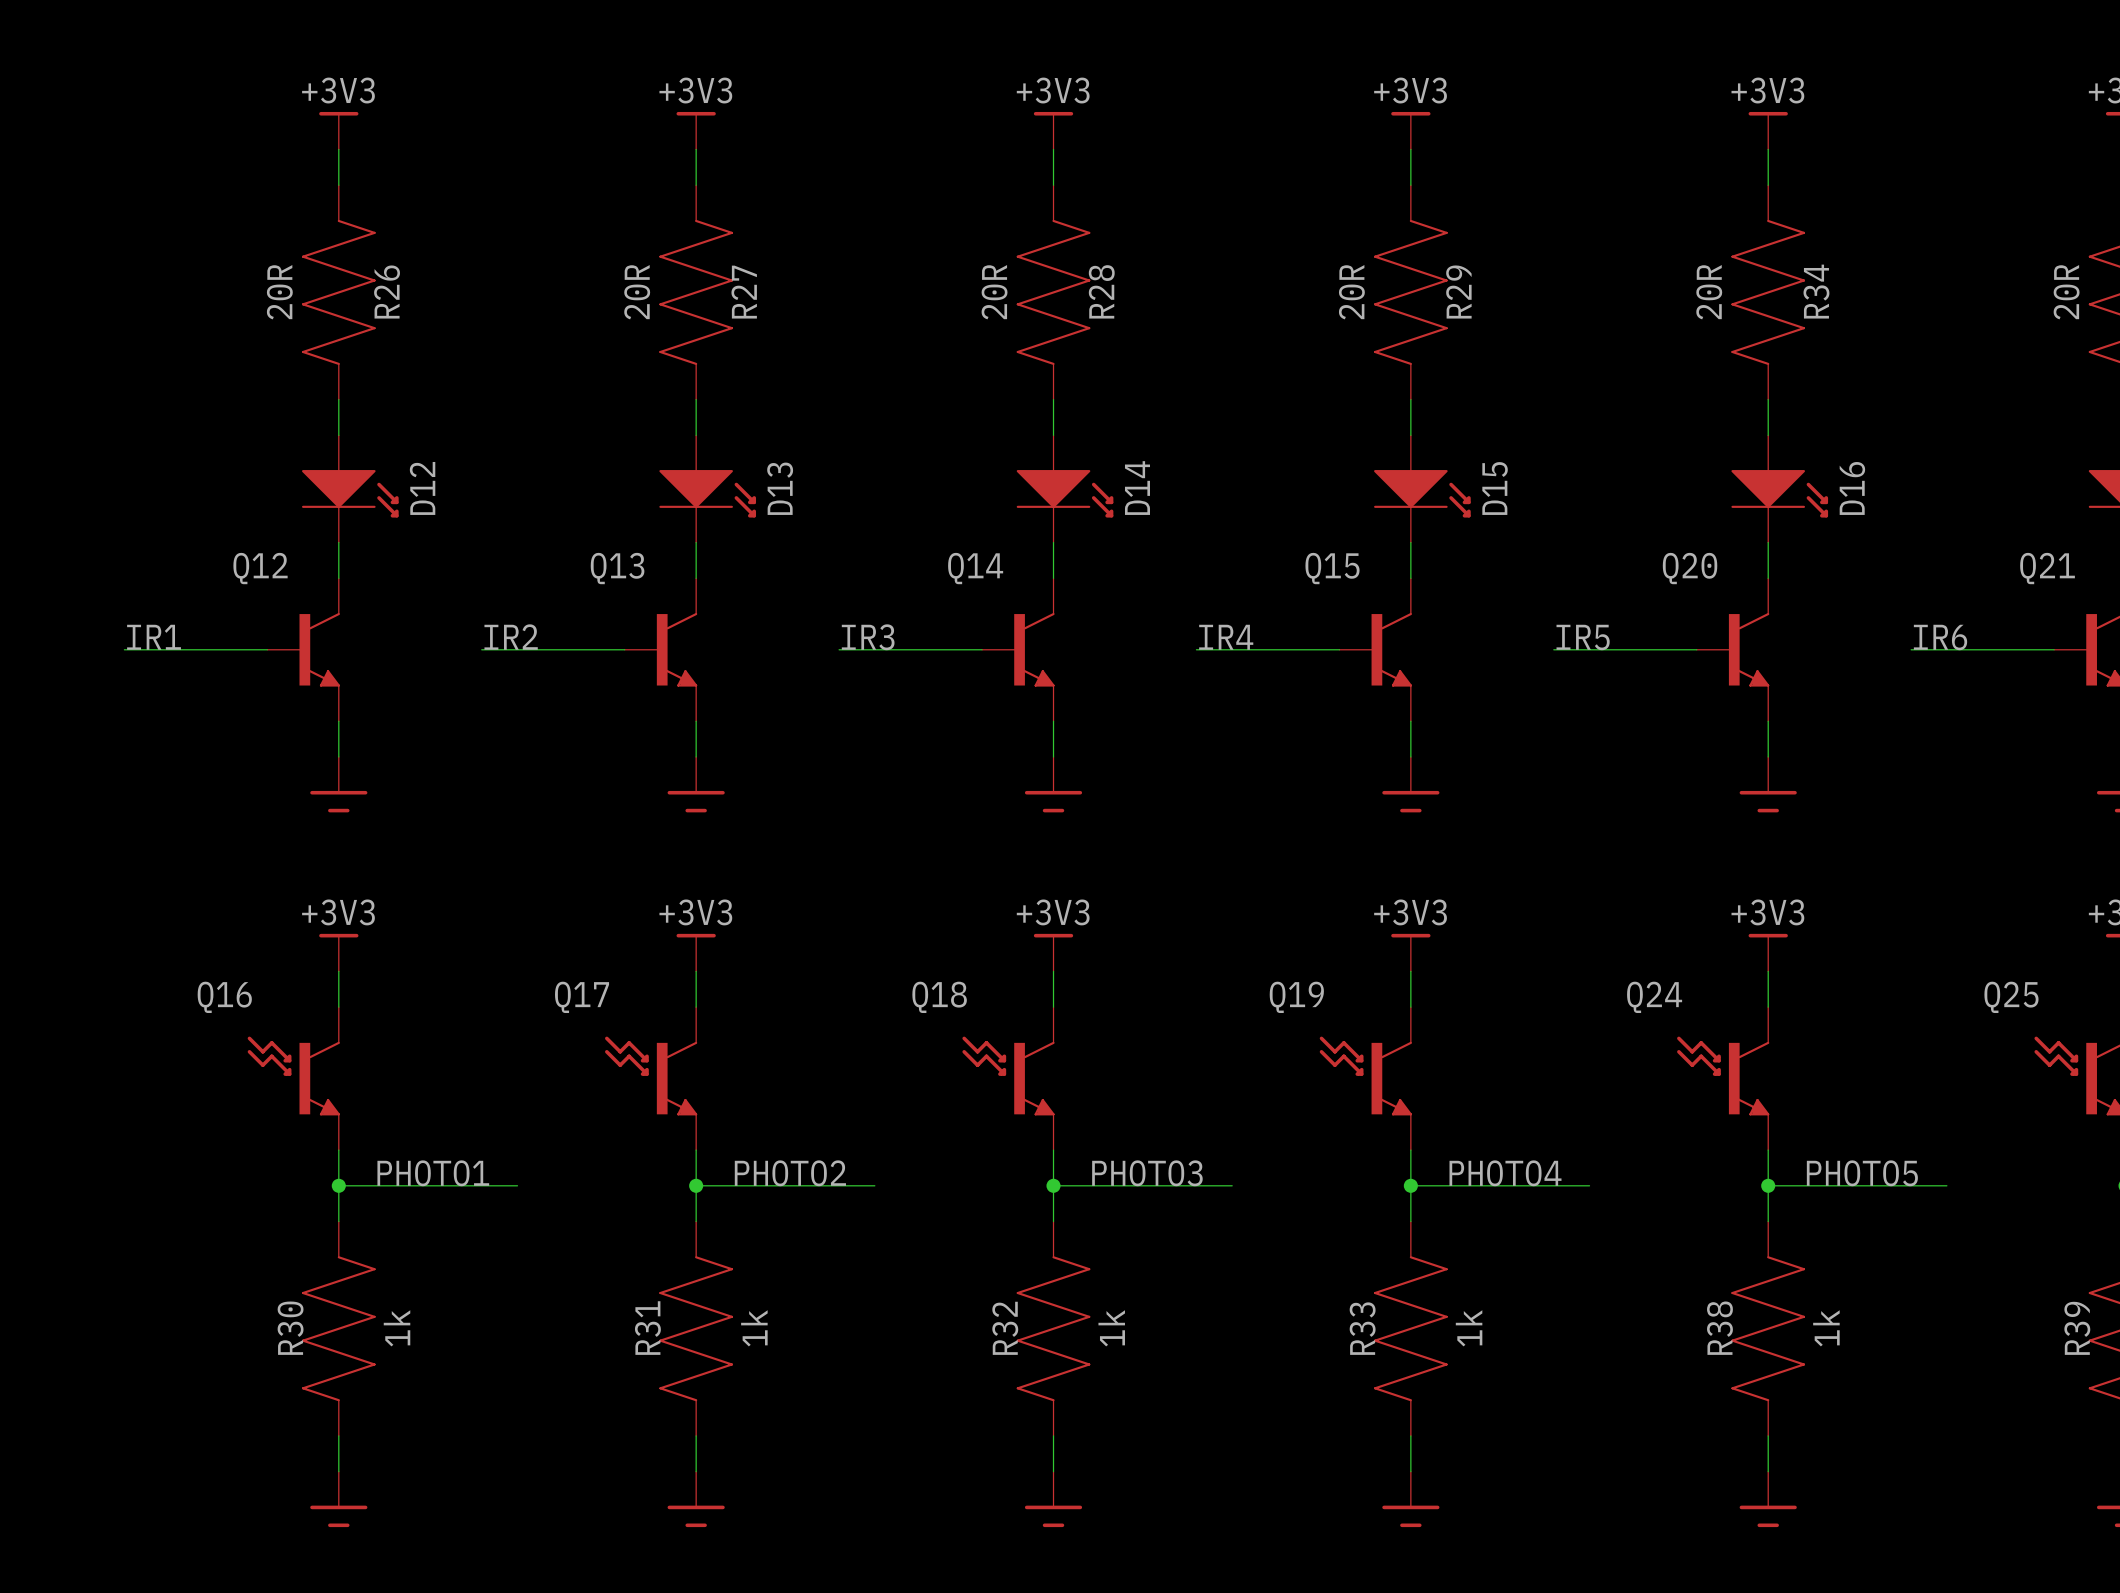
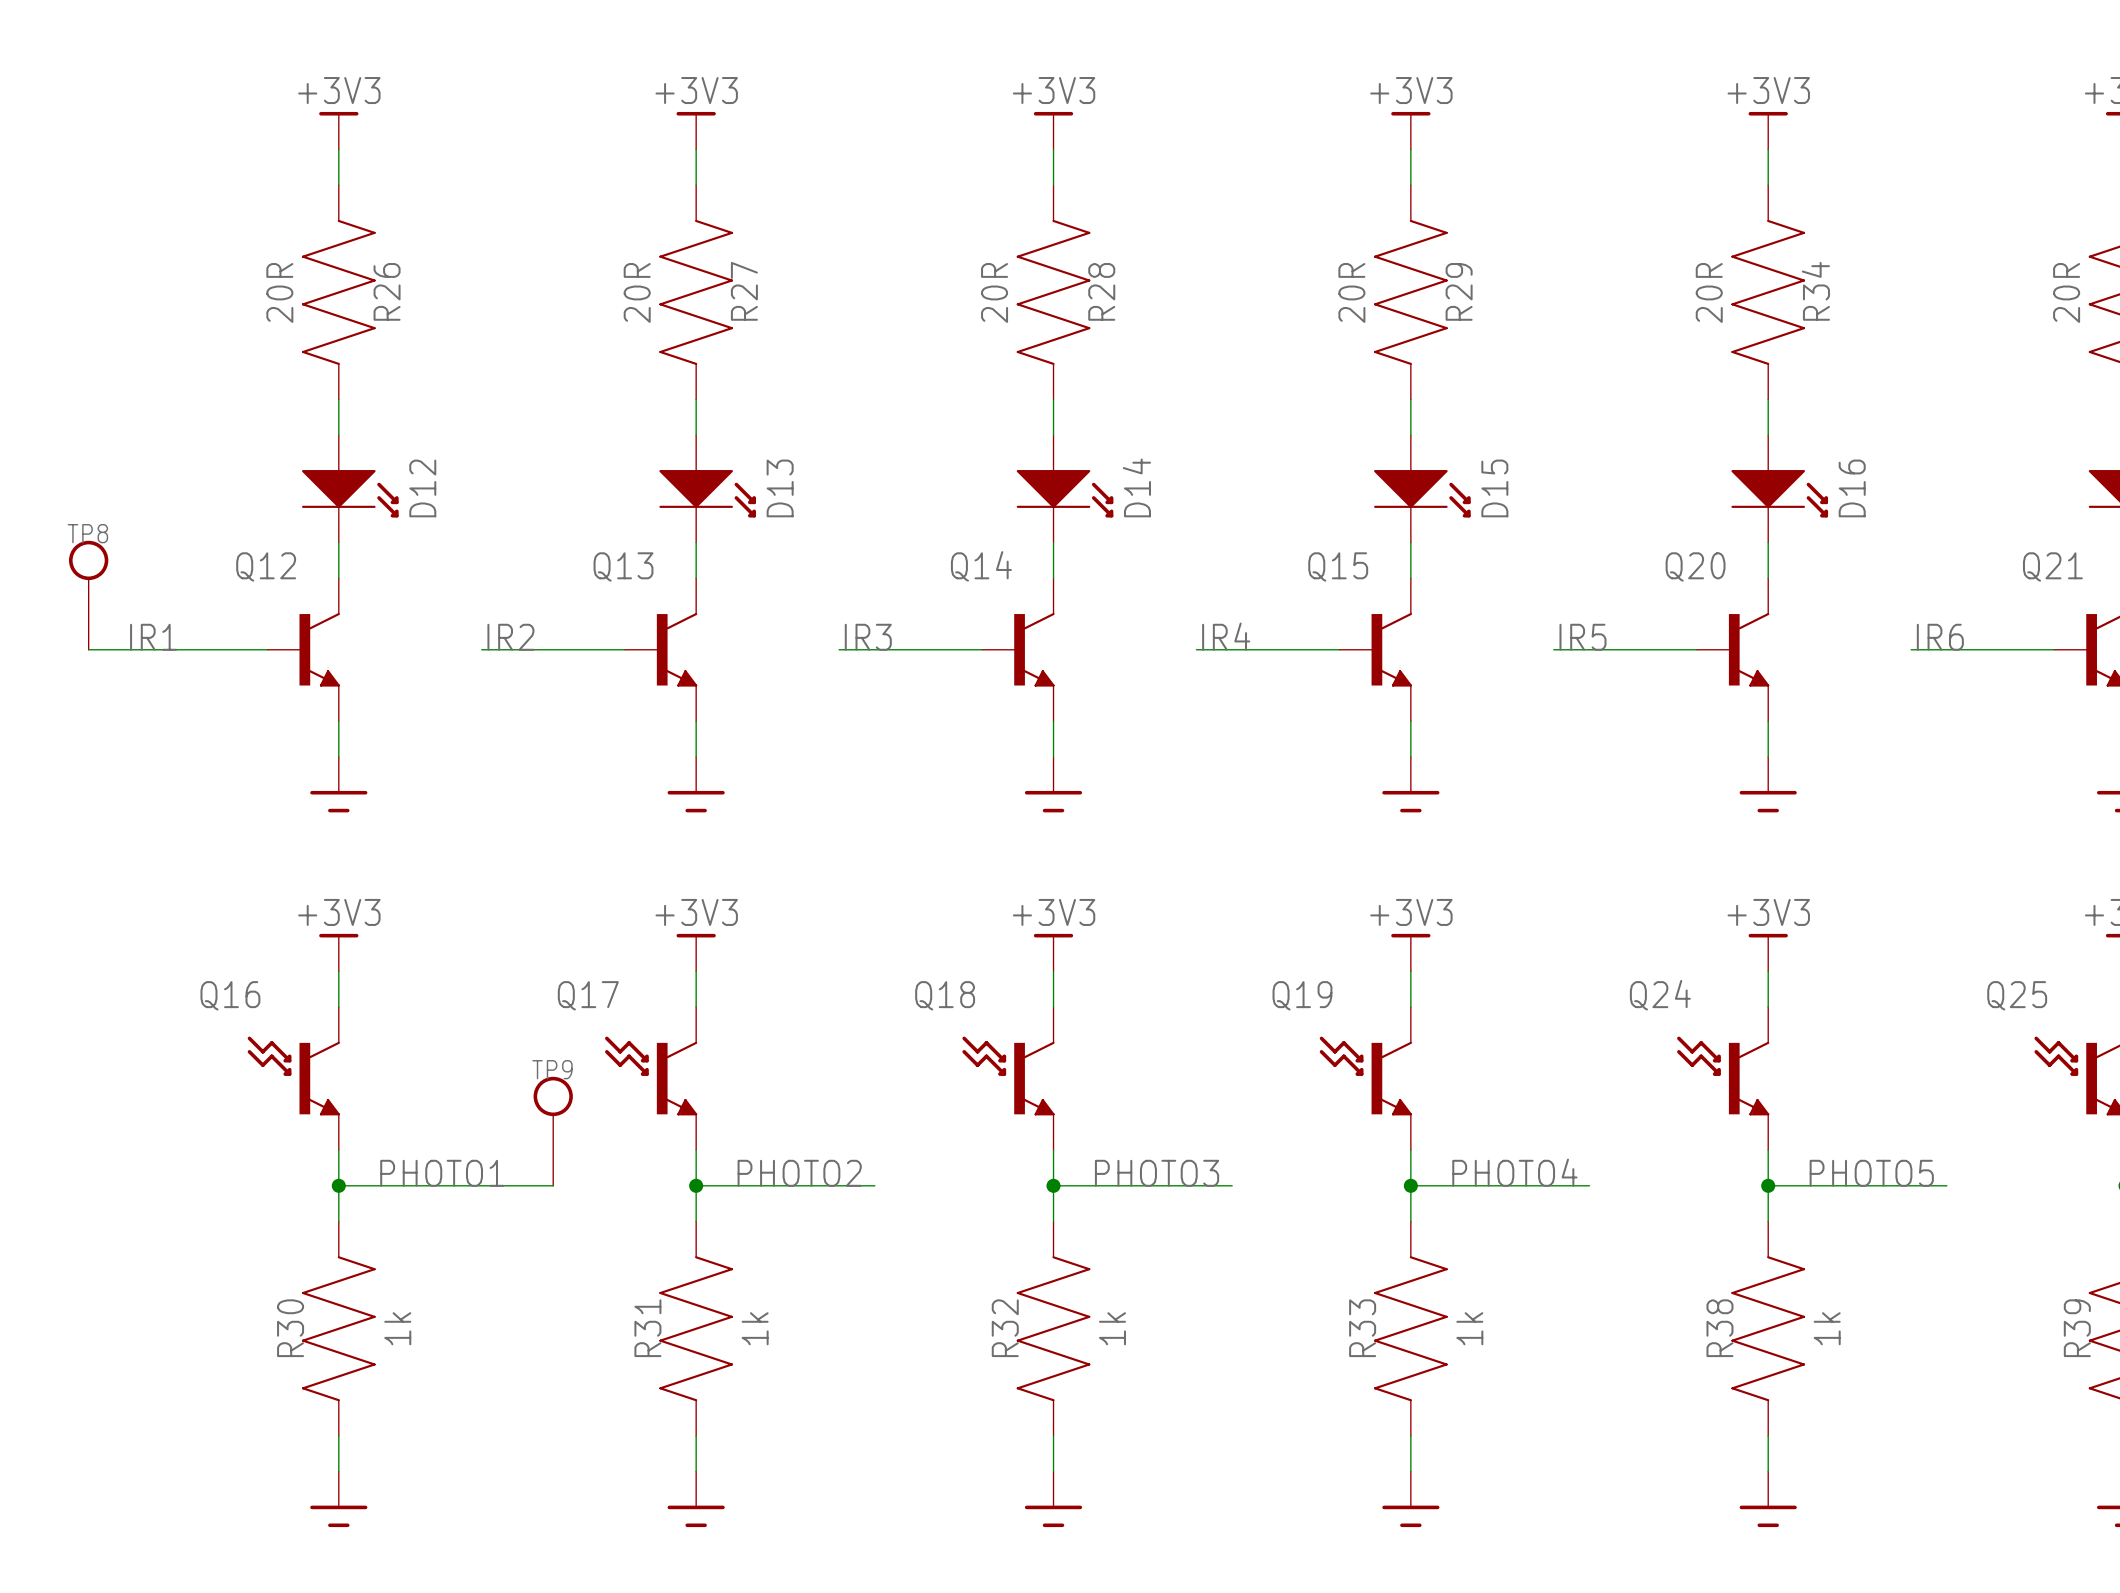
TP8: none -> (88, 595)
wire: none -> (88, 649) (124, 649)
TP9: none -> (553, 1131)
wire: none -> (517, 1185) (553, 1185)

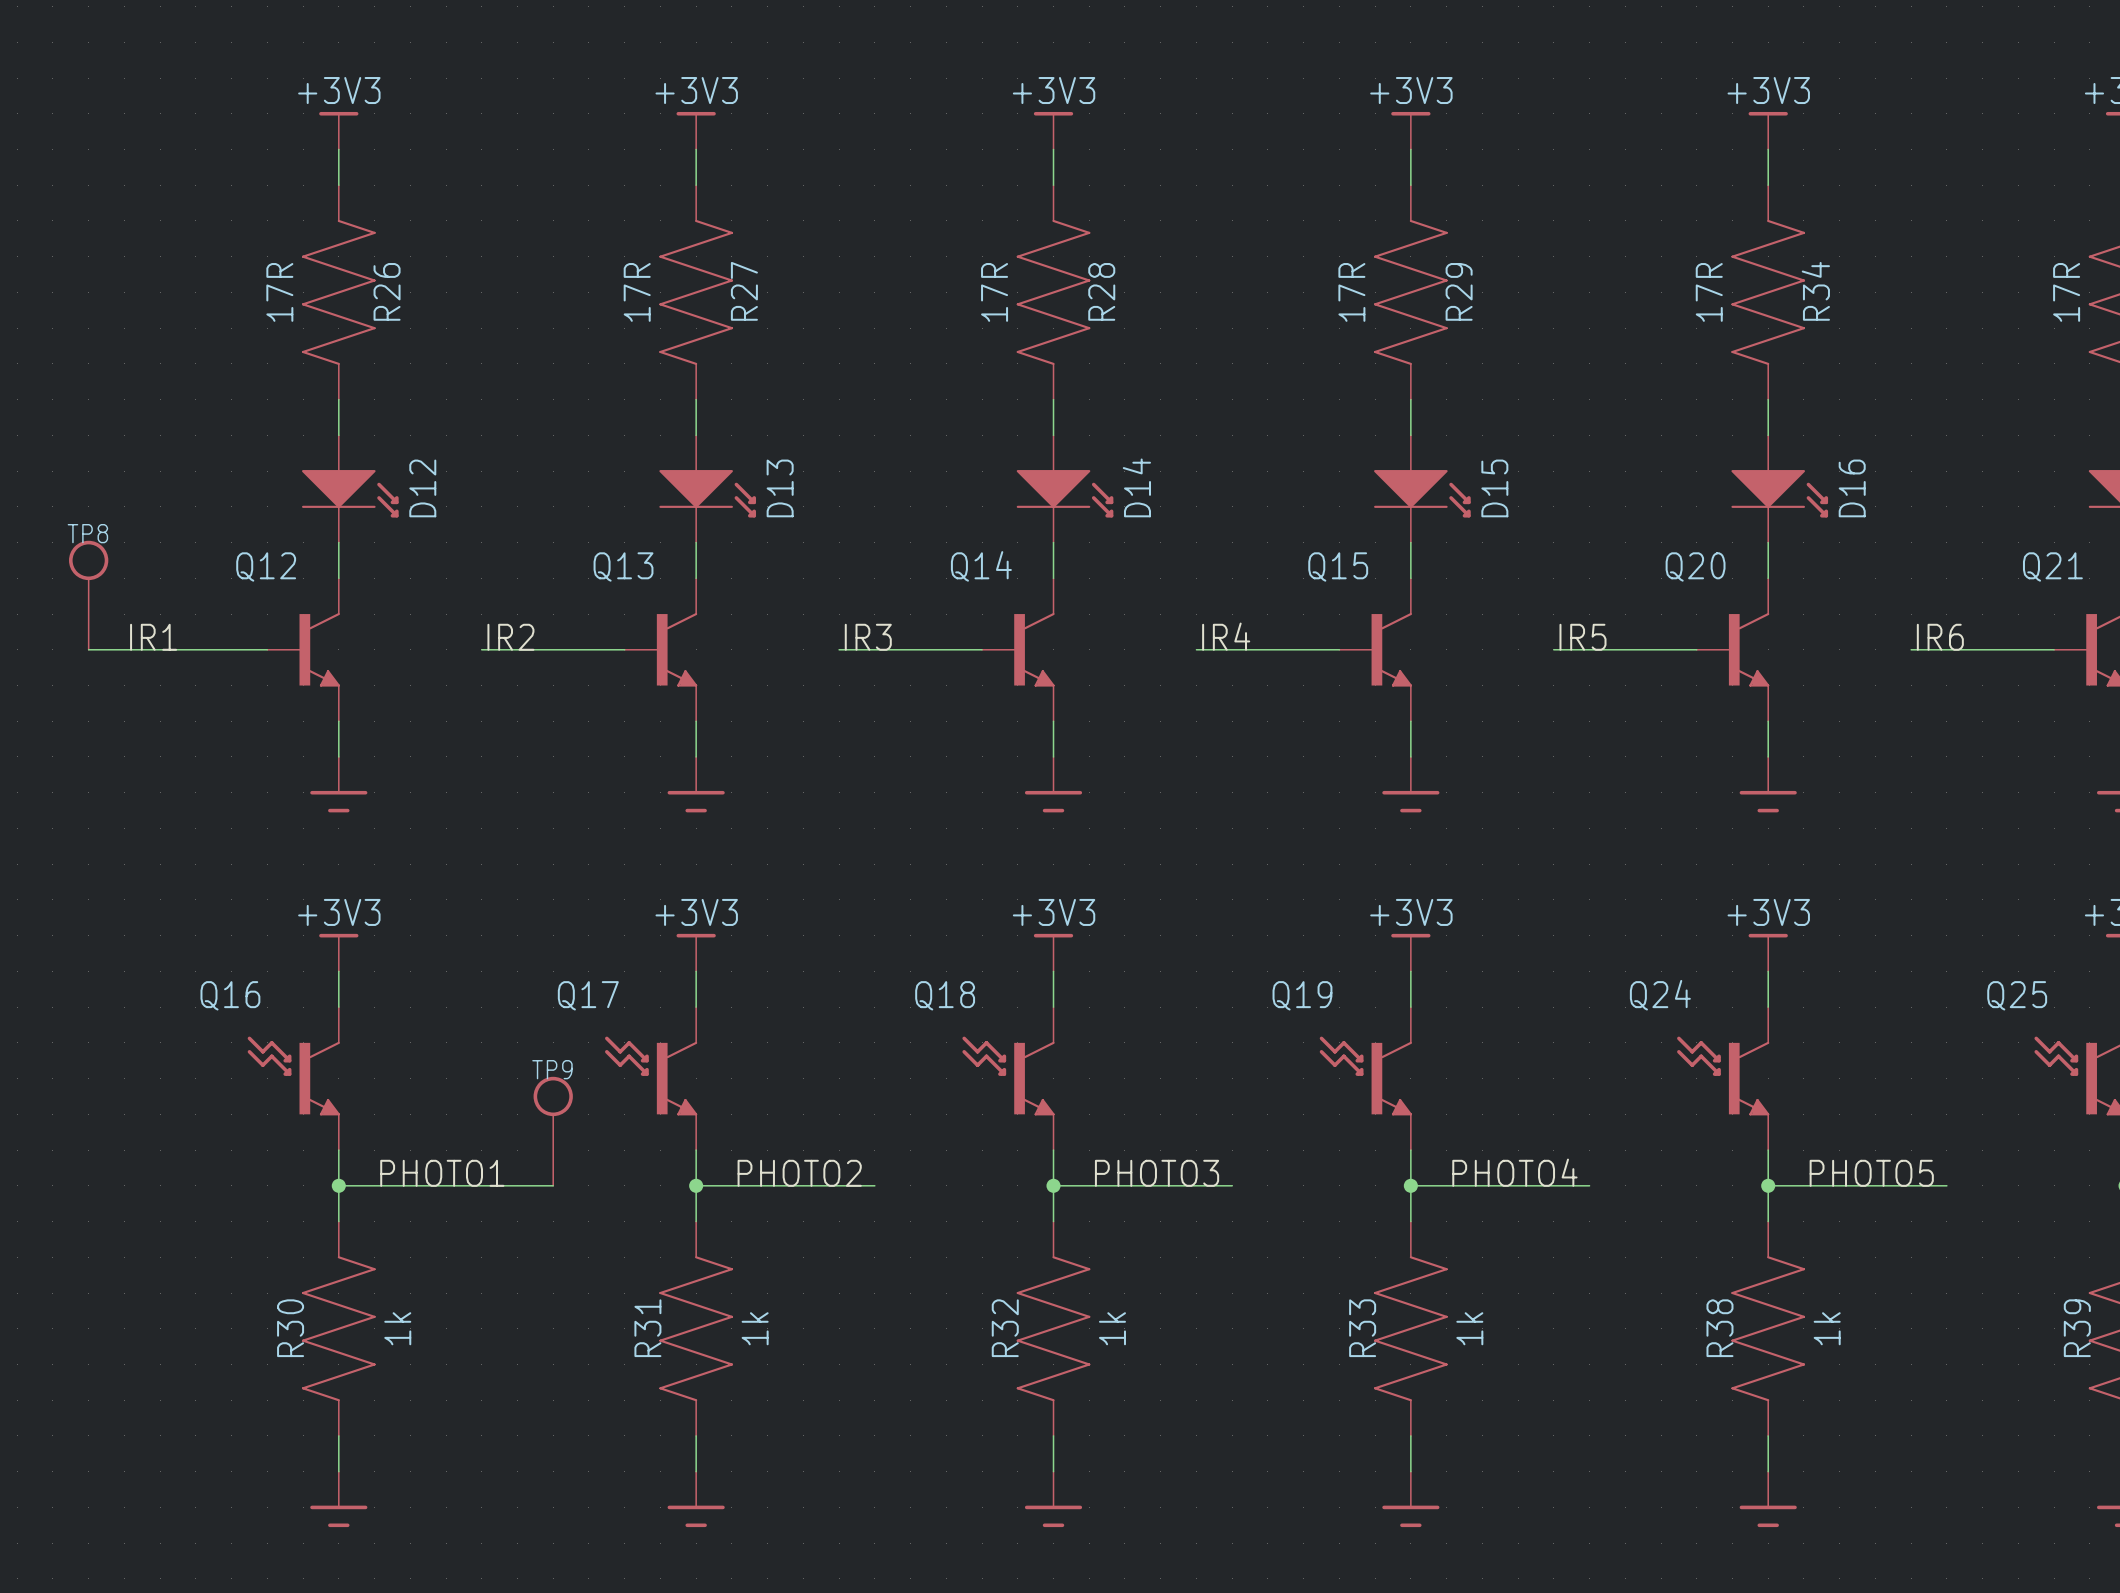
R26 value: 20R (279, 292) -> 17R (279, 292)
R27 value: 20R (637, 292) -> 17R (637, 292)
R28 value: 20R (994, 292) -> 17R (994, 292)
R29 value: 20R (1351, 292) -> 17R (1351, 292)
R34 value: 20R (1709, 292) -> 17R (1709, 292)
part value: 20R (2066, 292) -> 17R (2066, 292)

